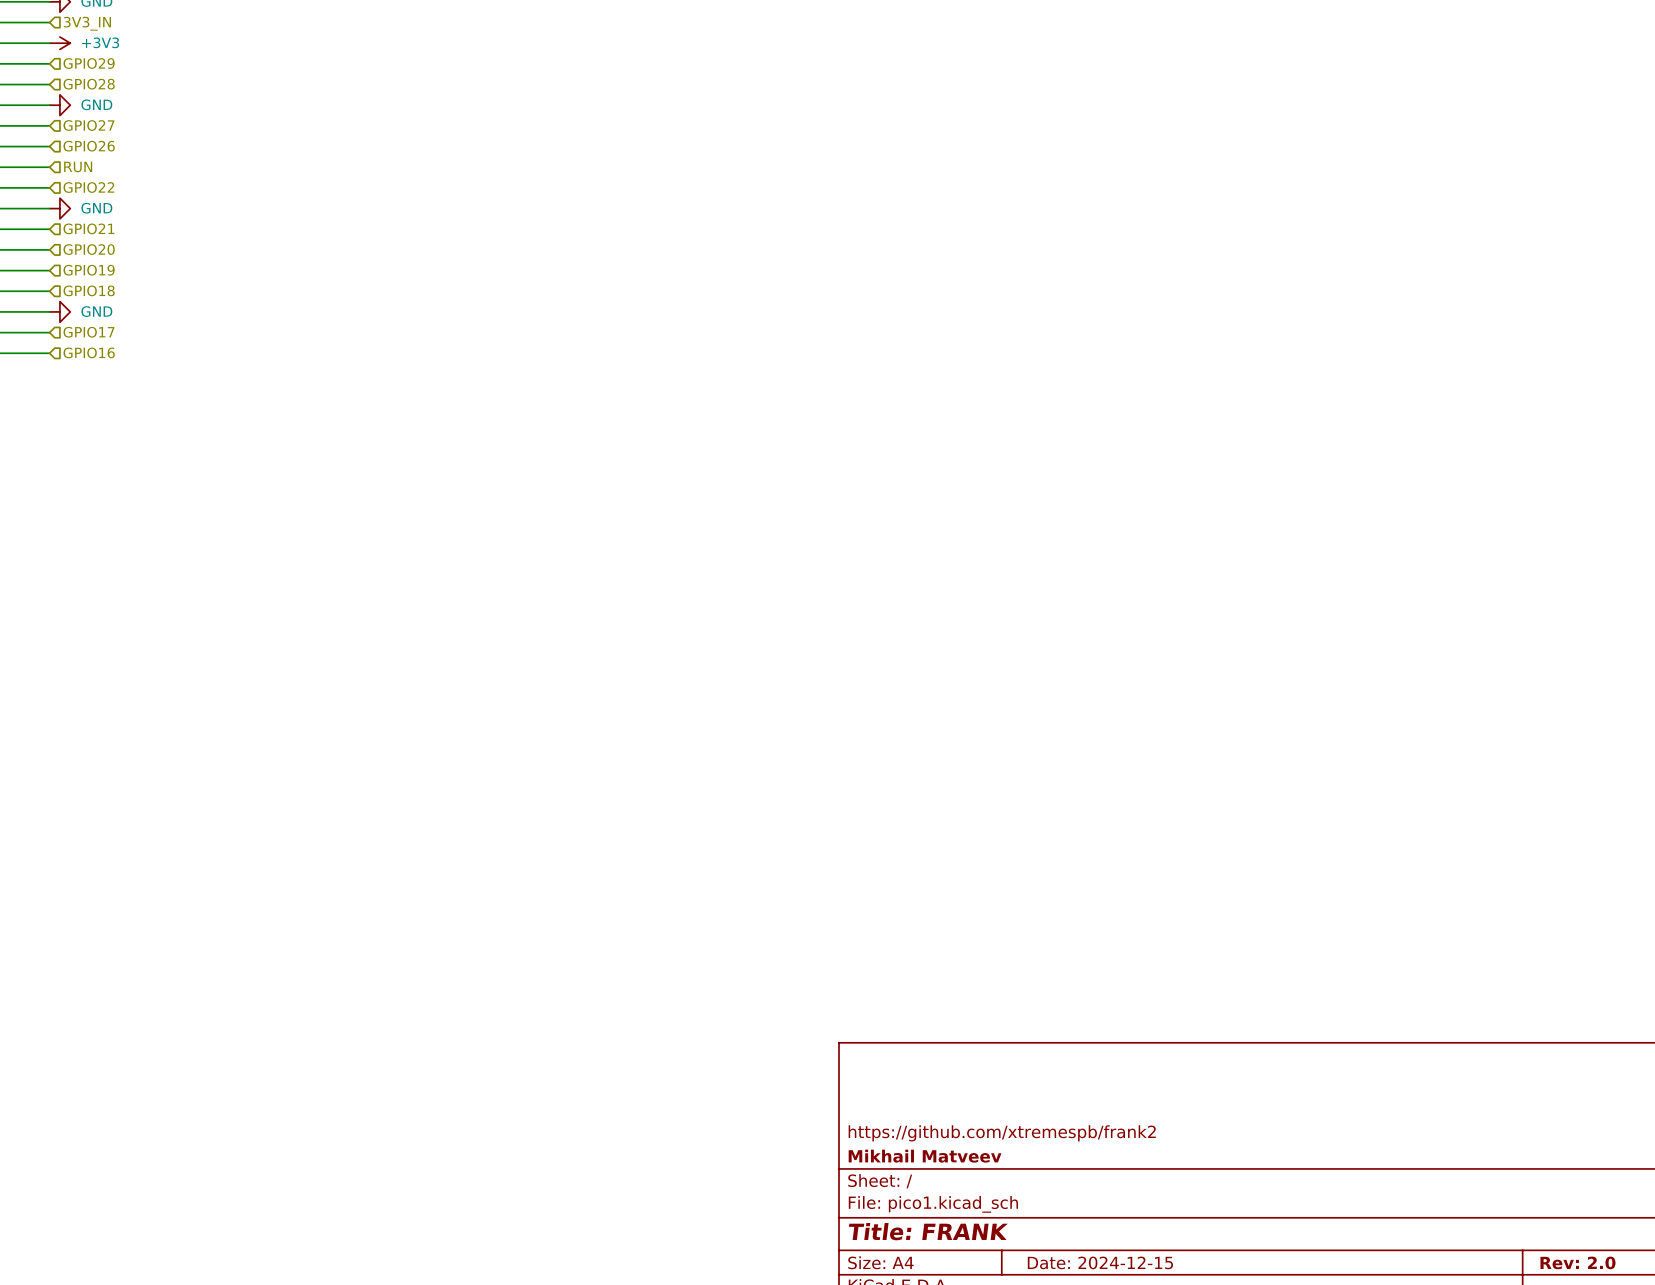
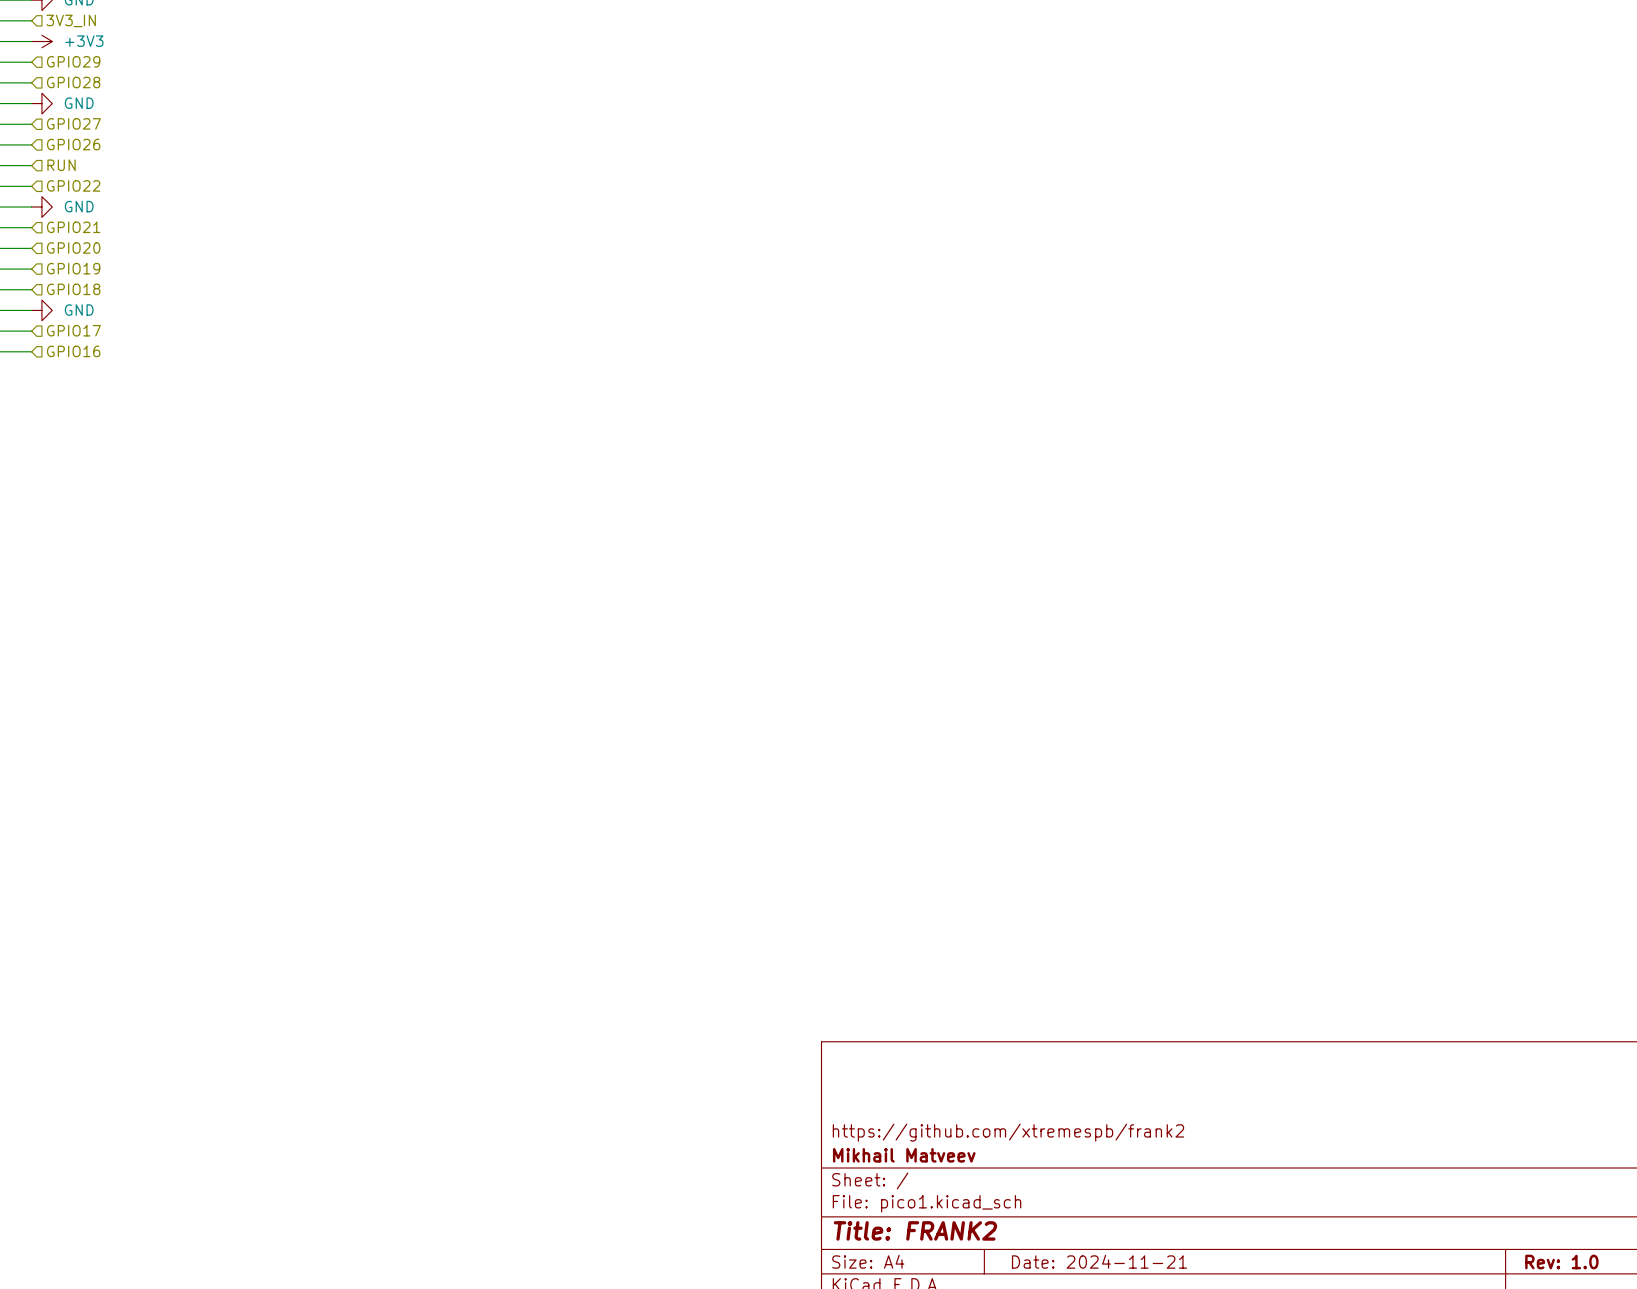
title block: Title: FRANK (928, 1231) -> Title: FRANK2 (915, 1230)
title block: Date: 2024-12-15 (1100, 1262) -> Date: 2024-11-21 (1099, 1261)
title block: Rev: 2.0 (1577, 1262) -> Rev: 1.0 (1561, 1262)

